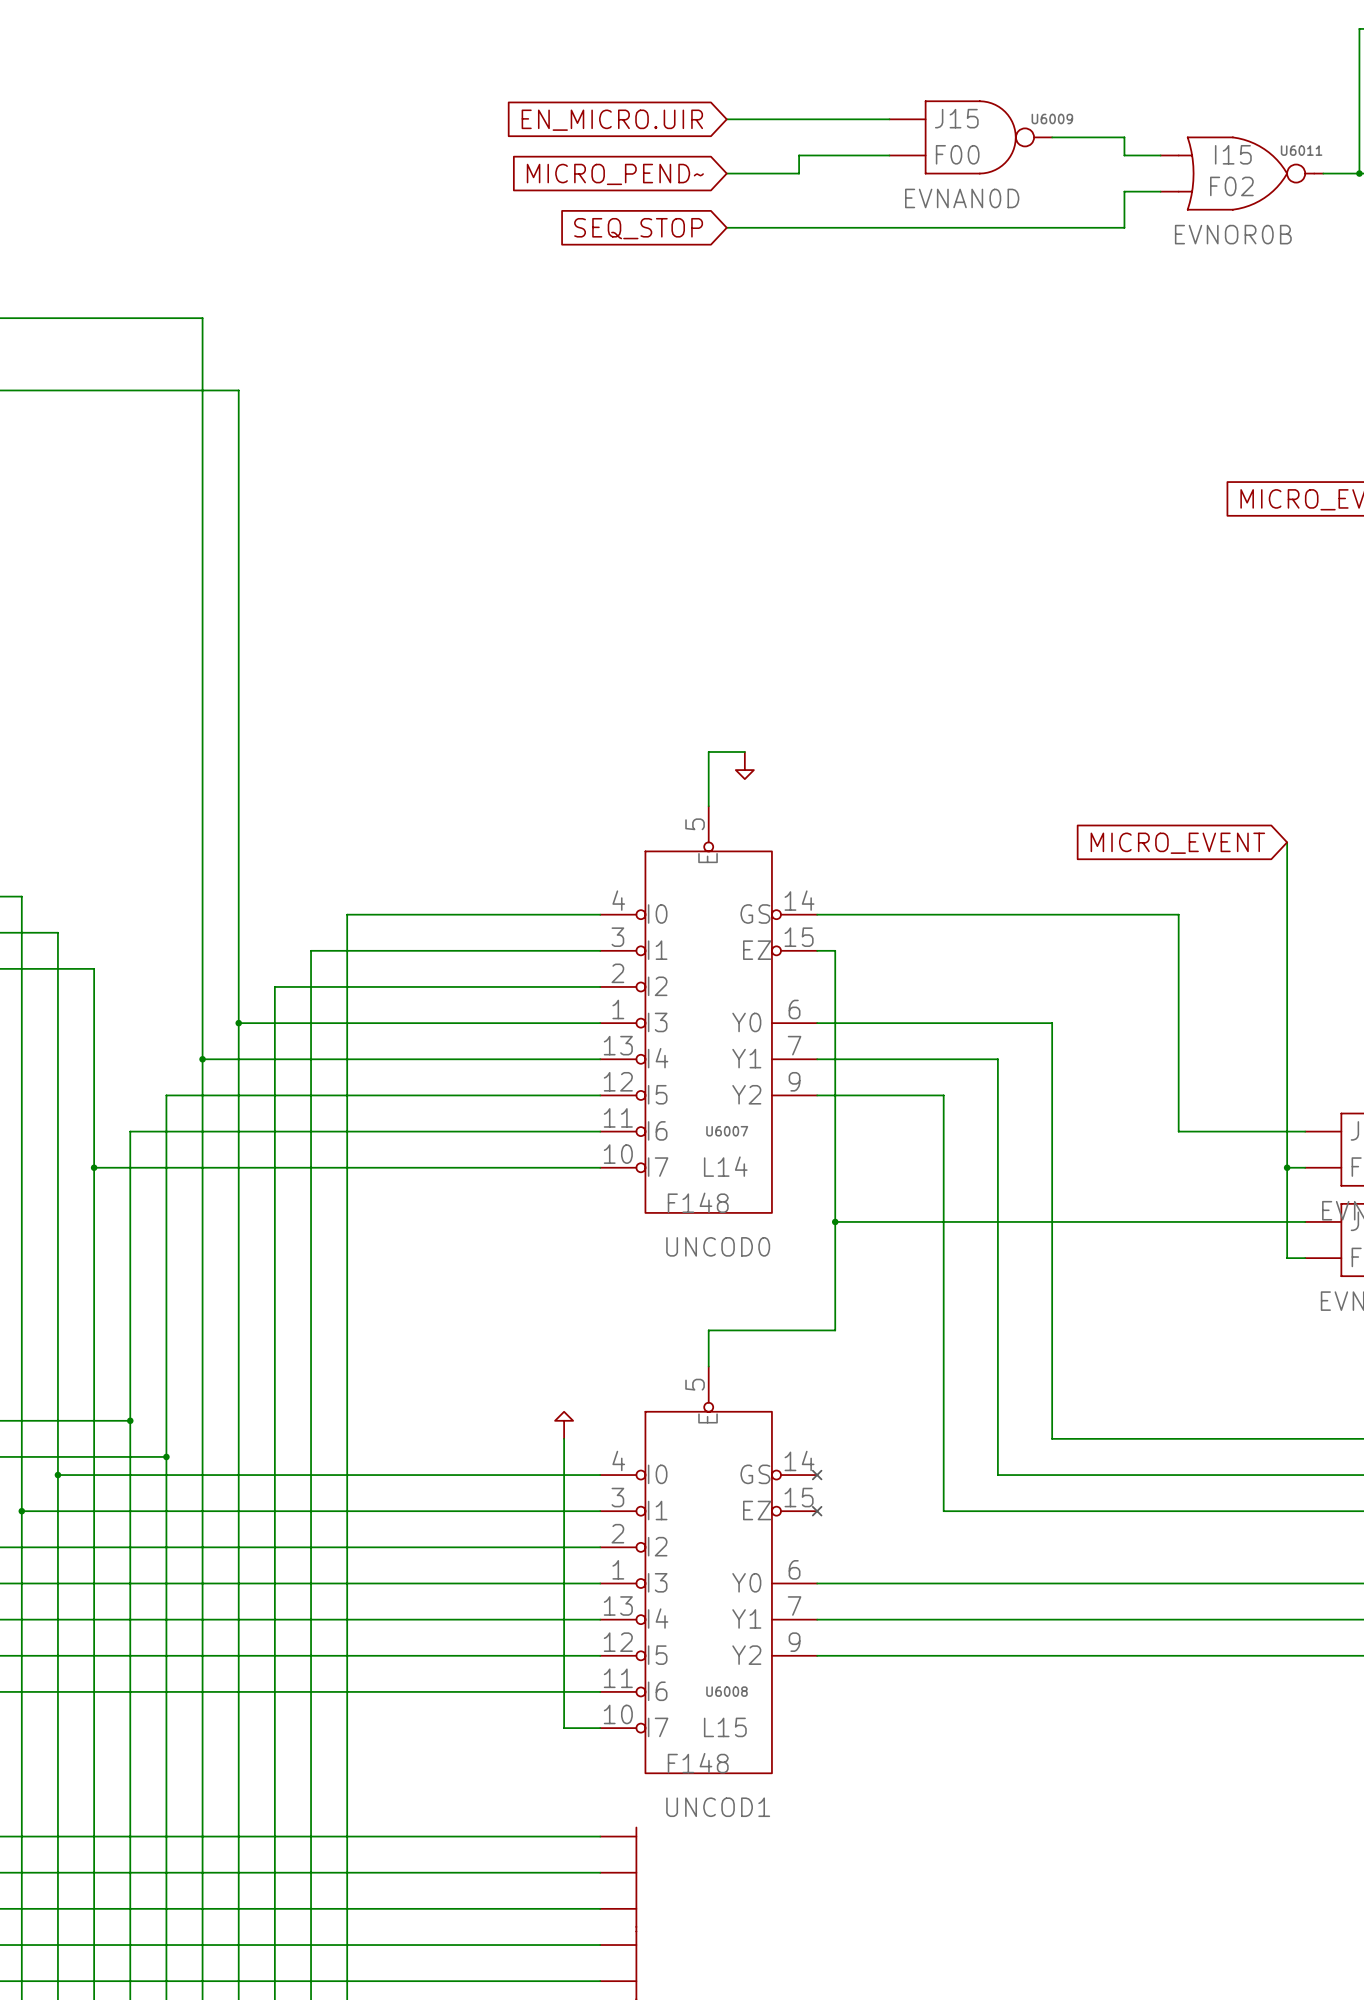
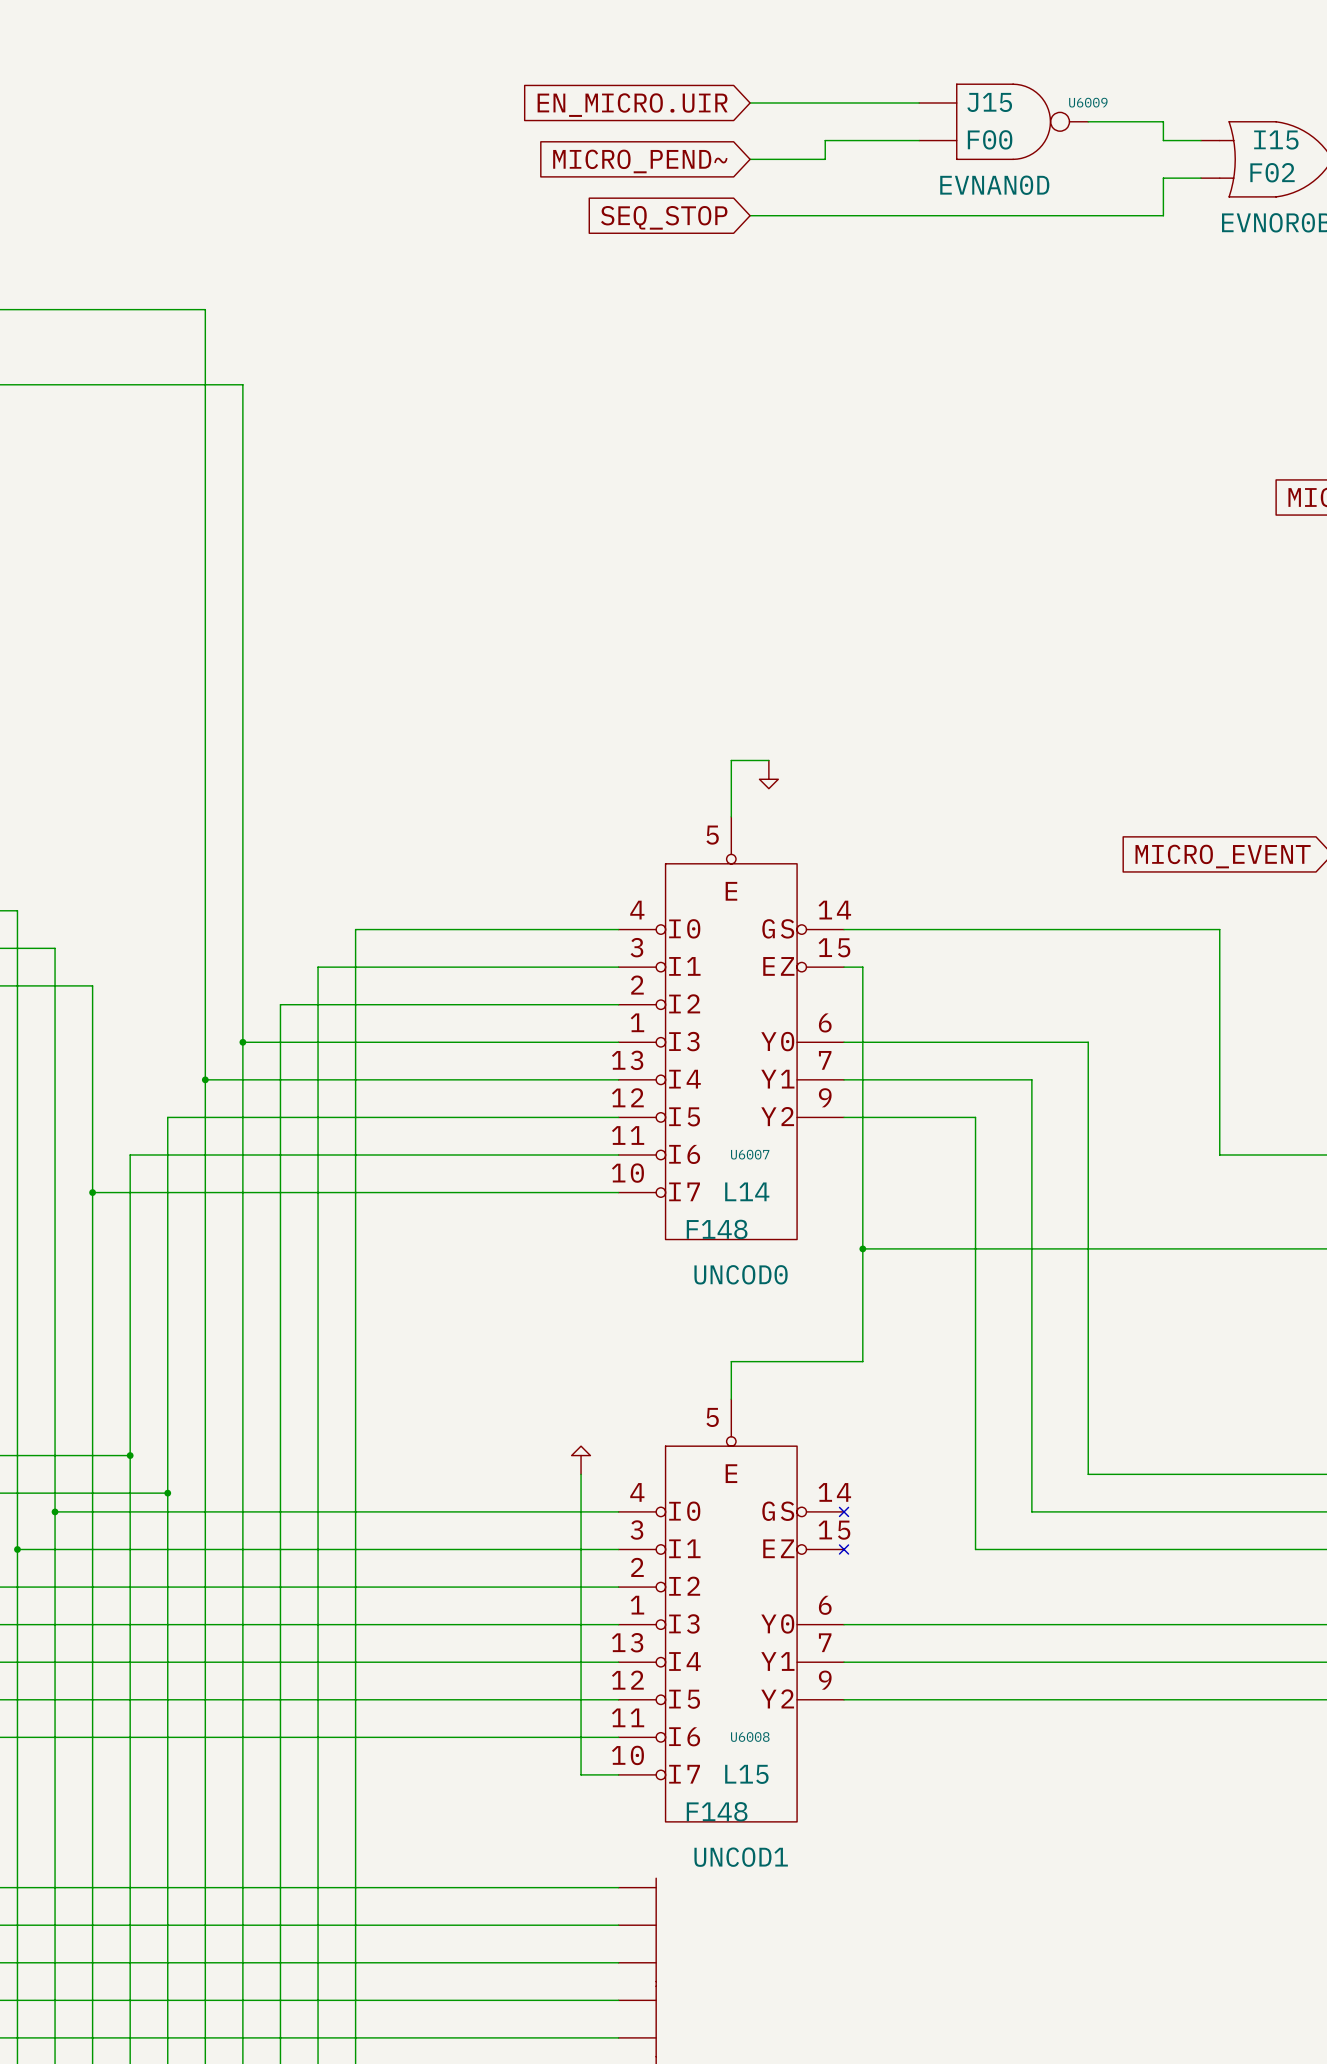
U6007 symbol: [600, 806, 818, 1213] -> [618, 816, 845, 1240]
U6008 symbol: [600, 1366, 818, 1774] -> [618, 1399, 845, 1822]

